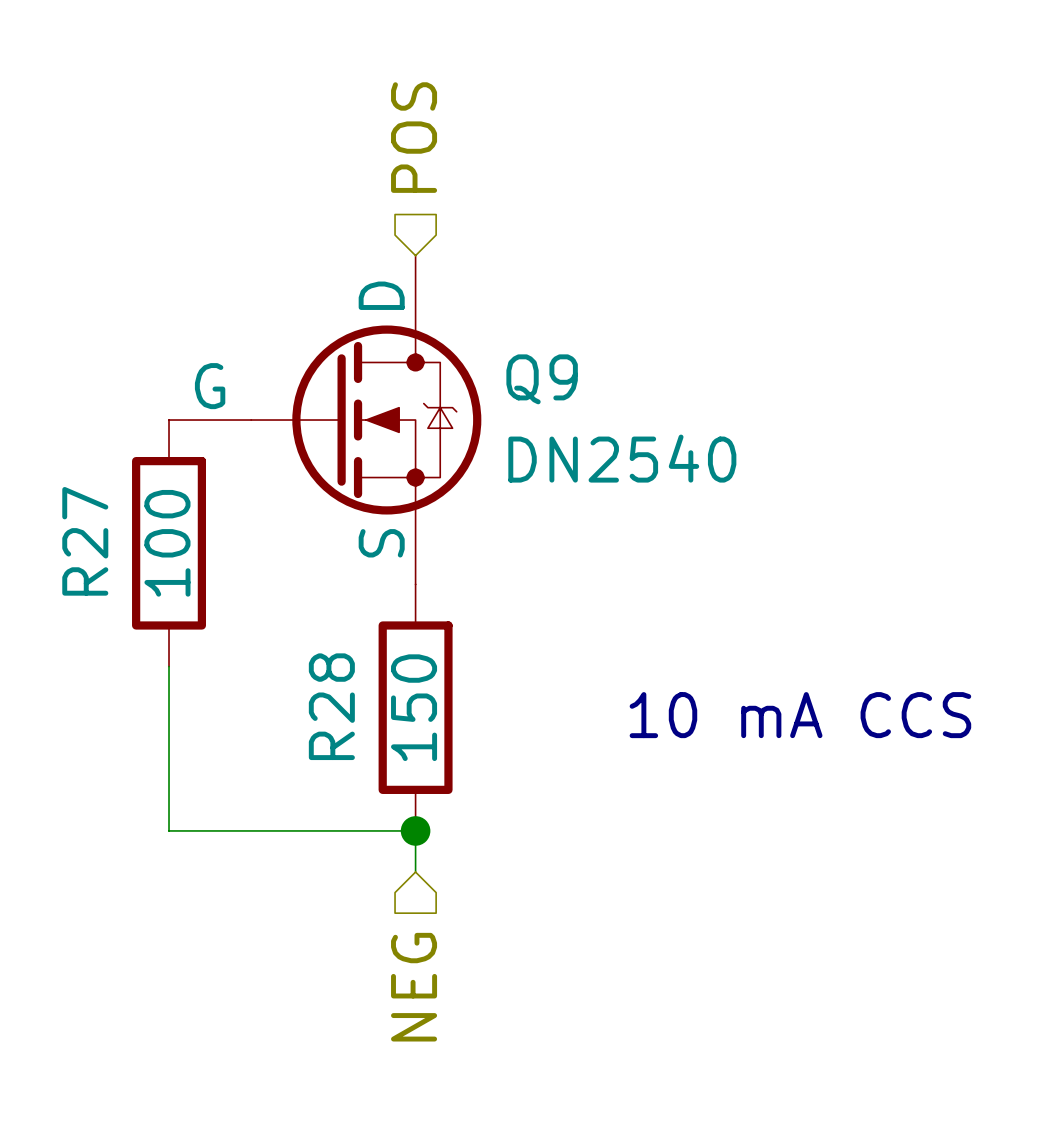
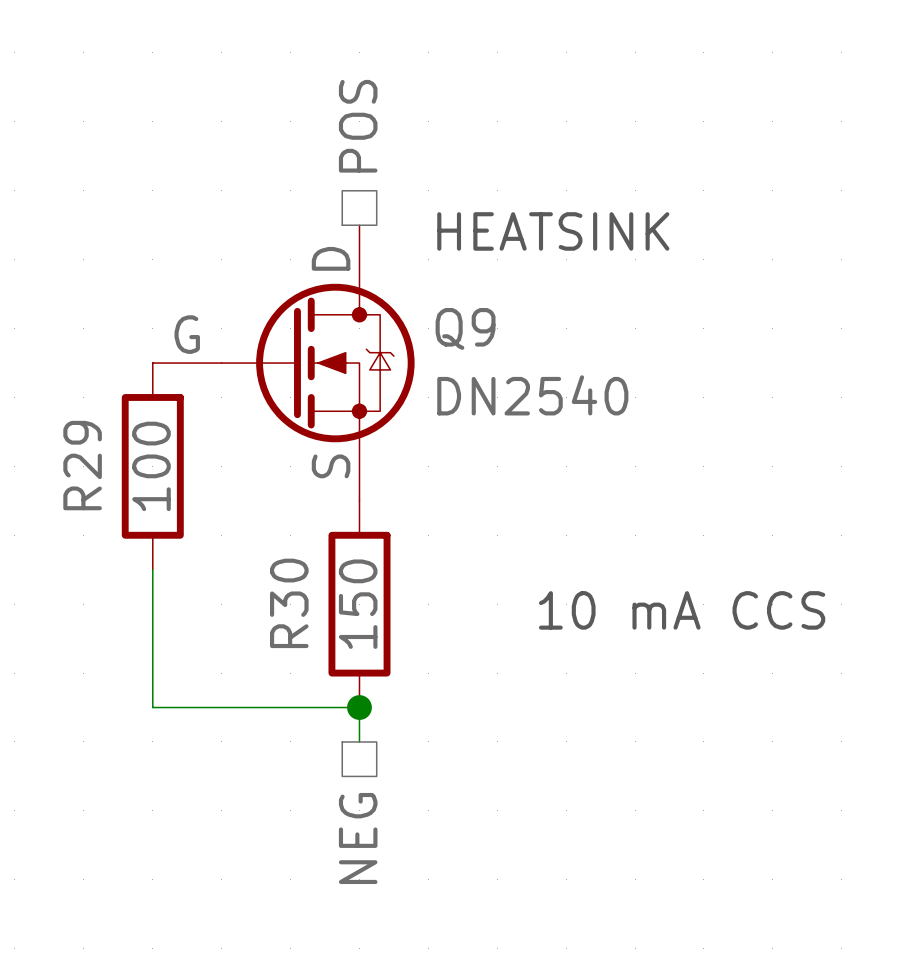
hierarchical label shape: input (414, 137) -> passive (358, 126)
text: none -> HEATSINK (553, 231)
R27 name: R27 (85, 541) -> R29 (82, 465)
R28 name: R28 (331, 706) -> R30 (289, 603)
hierarchical label shape: input (414, 987) -> passive (358, 838)

